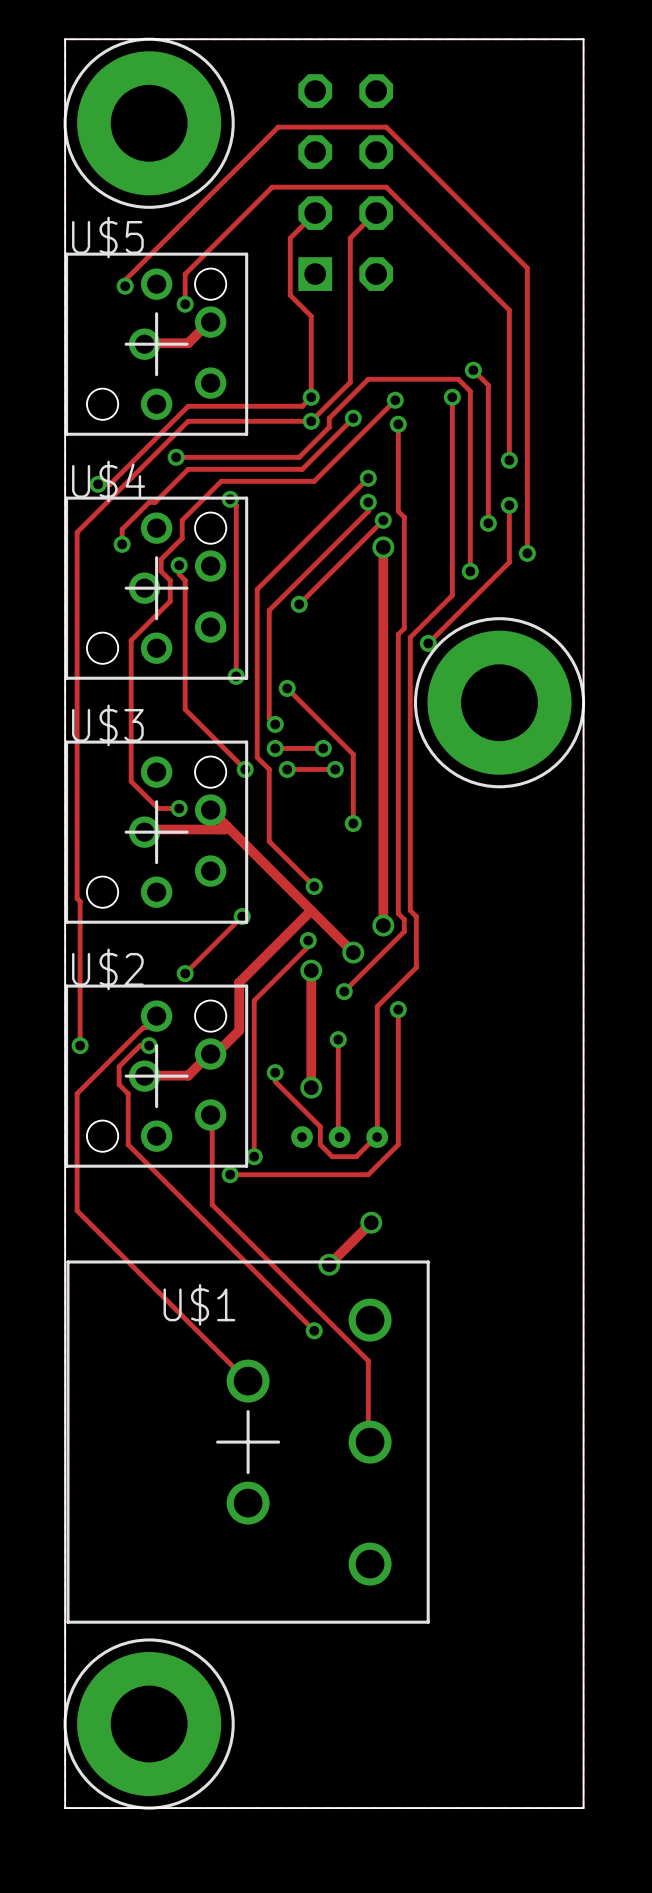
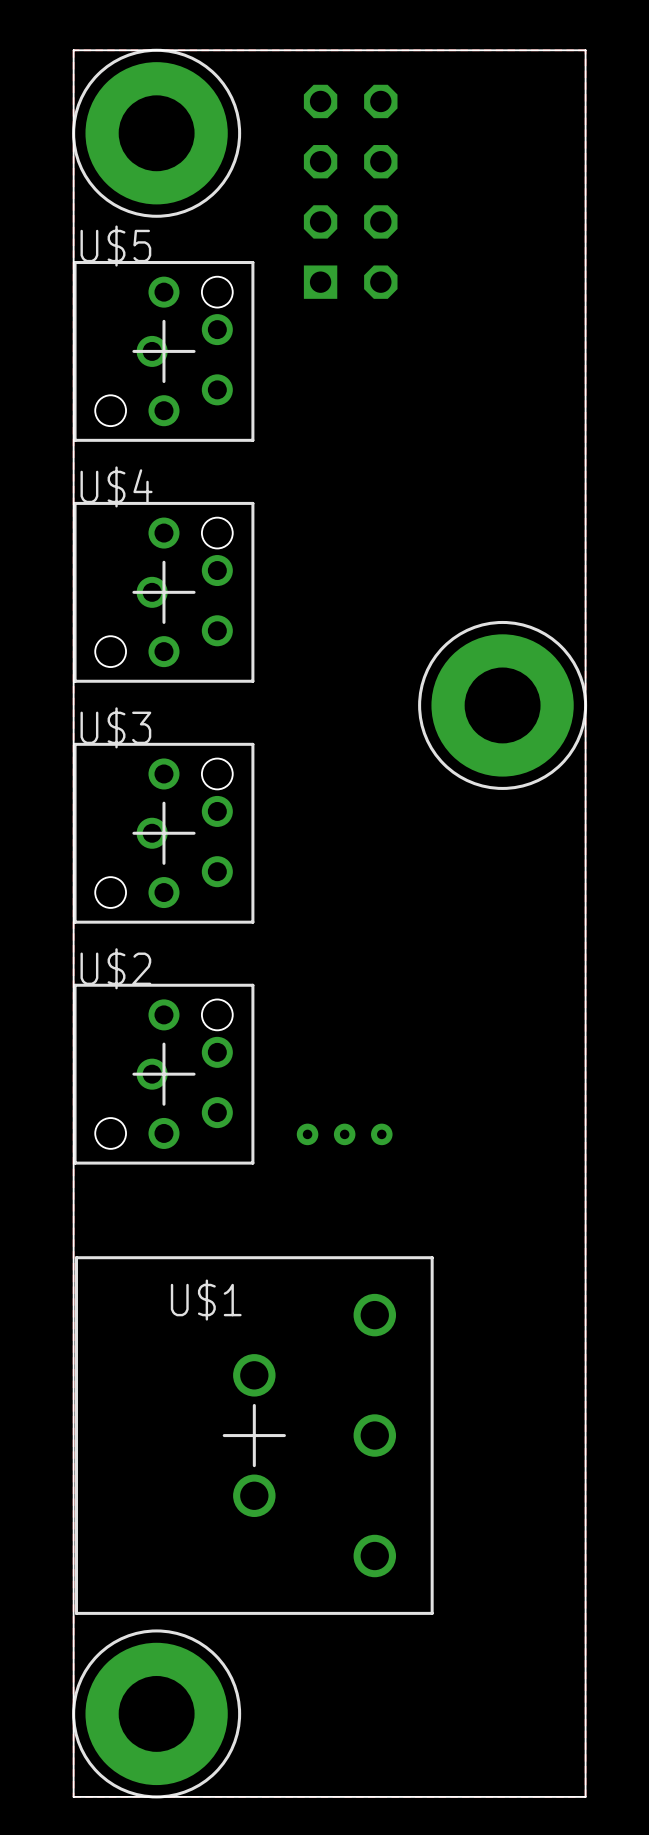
track: (315, 213) (290, 238) (290, 295) (311, 316) (311, 397) (302, 406) (188, 406) (110, 484) (98, 484) -> none
track: (376, 213) (350, 238) (350, 382) (311, 421) (188, 421) (77, 532) (77, 898) (80, 901) (80, 1045) -> none
track: (125, 286) (125, 280) (278, 127) (386, 127) (527, 268) (527, 553) -> none
via: (125, 286) -> none
track: (185, 304) (185, 274) (272, 187) (386, 187) (509, 310) (509, 460) -> none
via: (185, 304) -> none
track: (210, 322) (188, 343) (144, 344) -> none
track: (473, 370) (488, 385) (488, 523) -> none
via: (473, 370) -> none
via: (311, 397) -> none
track: (452, 397) (452, 595) (410, 637) (410, 910) (416, 916) (416, 967) (377, 1006) (377, 1137) (356, 1156) (332, 1156) (320, 1144) (320, 1126) (275, 1081) (275, 1072) -> none
via: (452, 397) -> none
track: (395, 400) (314, 481) (221, 481) (182, 520) (182, 538) (161, 559) (161, 571) (170, 580) (170, 601) (131, 640) (131, 781) (158, 808) (179, 808) -> none
via: (395, 400) -> none
track: (353, 418) (302, 469) (188, 469) (155, 502) (149, 502) (122, 529) (122, 544) -> none
via: (353, 418) -> none
via: (311, 421) -> none
track: (398, 424) (398, 511) (404, 517) (404, 628) (398, 634) (398, 913) (404, 919) (404, 931) (344, 991) -> none
via: (398, 424) -> none
track: (176, 457) (299, 457) (329, 427) (329, 418) (368, 379) (458, 379) (470, 391) (470, 571) -> none
via: (176, 457) -> none
via: (509, 460) -> none
track: (368, 478) (257, 589) (257, 757) (269, 769) (269, 841) (314, 886) -> none
via: (368, 478) -> none
via: (98, 484) -> none
track: (230, 499) (236, 505) (236, 676) -> none
via: (230, 499) -> none
track: (368, 502) (368, 511) (269, 610) (269, 718) (275, 724) -> none
via: (368, 502) -> none
track: (509, 505) (509, 562) (428, 643) -> none
via: (509, 505) -> none
track: (383, 520) (299, 604) -> none
via: (383, 520) -> none
via: (488, 523) -> none
via: (122, 544) -> none
track: (383, 547) (383, 925) -> none
via: (383, 547) -> none
via: (527, 553) -> none
track: (179, 565) (179, 574) (185, 580) (185, 709) (245, 769) -> none
via: (179, 565) -> none
via: (470, 571) -> none
via: (299, 604) -> none
via: (428, 643) -> none
via: (236, 676) -> none
track: (287, 688) (353, 754) (353, 823) -> none
via: (287, 688) -> none
via: (275, 724) -> none
track: (275, 748) (323, 748) -> none
via: (275, 748) -> none
via: (323, 748) -> none
via: (245, 769) -> none
track: (287, 769) (335, 769) -> none
via: (287, 769) -> none
via: (335, 769) -> none
via: (179, 808) -> none
track: (210, 810) (353, 952) -> none
via: (353, 823) -> none
track: (227, 826) (224, 829) (146, 829) (144, 832) -> none
via: (314, 886) -> none
track: (311, 910) (239, 982) (239, 1030) (215, 1054) (209, 1054) (188, 1075) (144, 1076) -> none
track: (242, 916) (185, 973) -> none
via: (242, 916) -> none
via: (383, 925) -> none
track: (308, 940) (308, 946) (254, 1000) (254, 1156) -> none
via: (308, 940) -> none
via: (353, 952) -> none
track: (311, 970) (311, 1087) -> none
via: (311, 970) -> none
via: (185, 973) -> none
via: (344, 991) -> none
track: (398, 1009) (398, 1144) (368, 1174) (230, 1174) -> none
via: (398, 1009) -> none
track: (156, 1016) (77, 1093) (77, 1210) (248, 1381) -> none
track: (338, 1039) (339, 1137) -> none
via: (338, 1039) -> none
via: (80, 1045) -> none
track: (149, 1045) (140, 1045) (119, 1066) (119, 1084) (128, 1093) (128, 1144) (314, 1330) -> none
via: (149, 1045) -> none
via: (275, 1072) -> none
via: (311, 1087) -> none
track: (210, 1115) (212, 1117) (212, 1204) (368, 1360) (368, 1441) (370, 1442) -> none
via: (254, 1156) -> none
via: (230, 1174) -> none
track: (371, 1222) (329, 1264) -> none
via: (371, 1222) -> none
via: (329, 1264) -> none
via: (314, 1330) -> none

